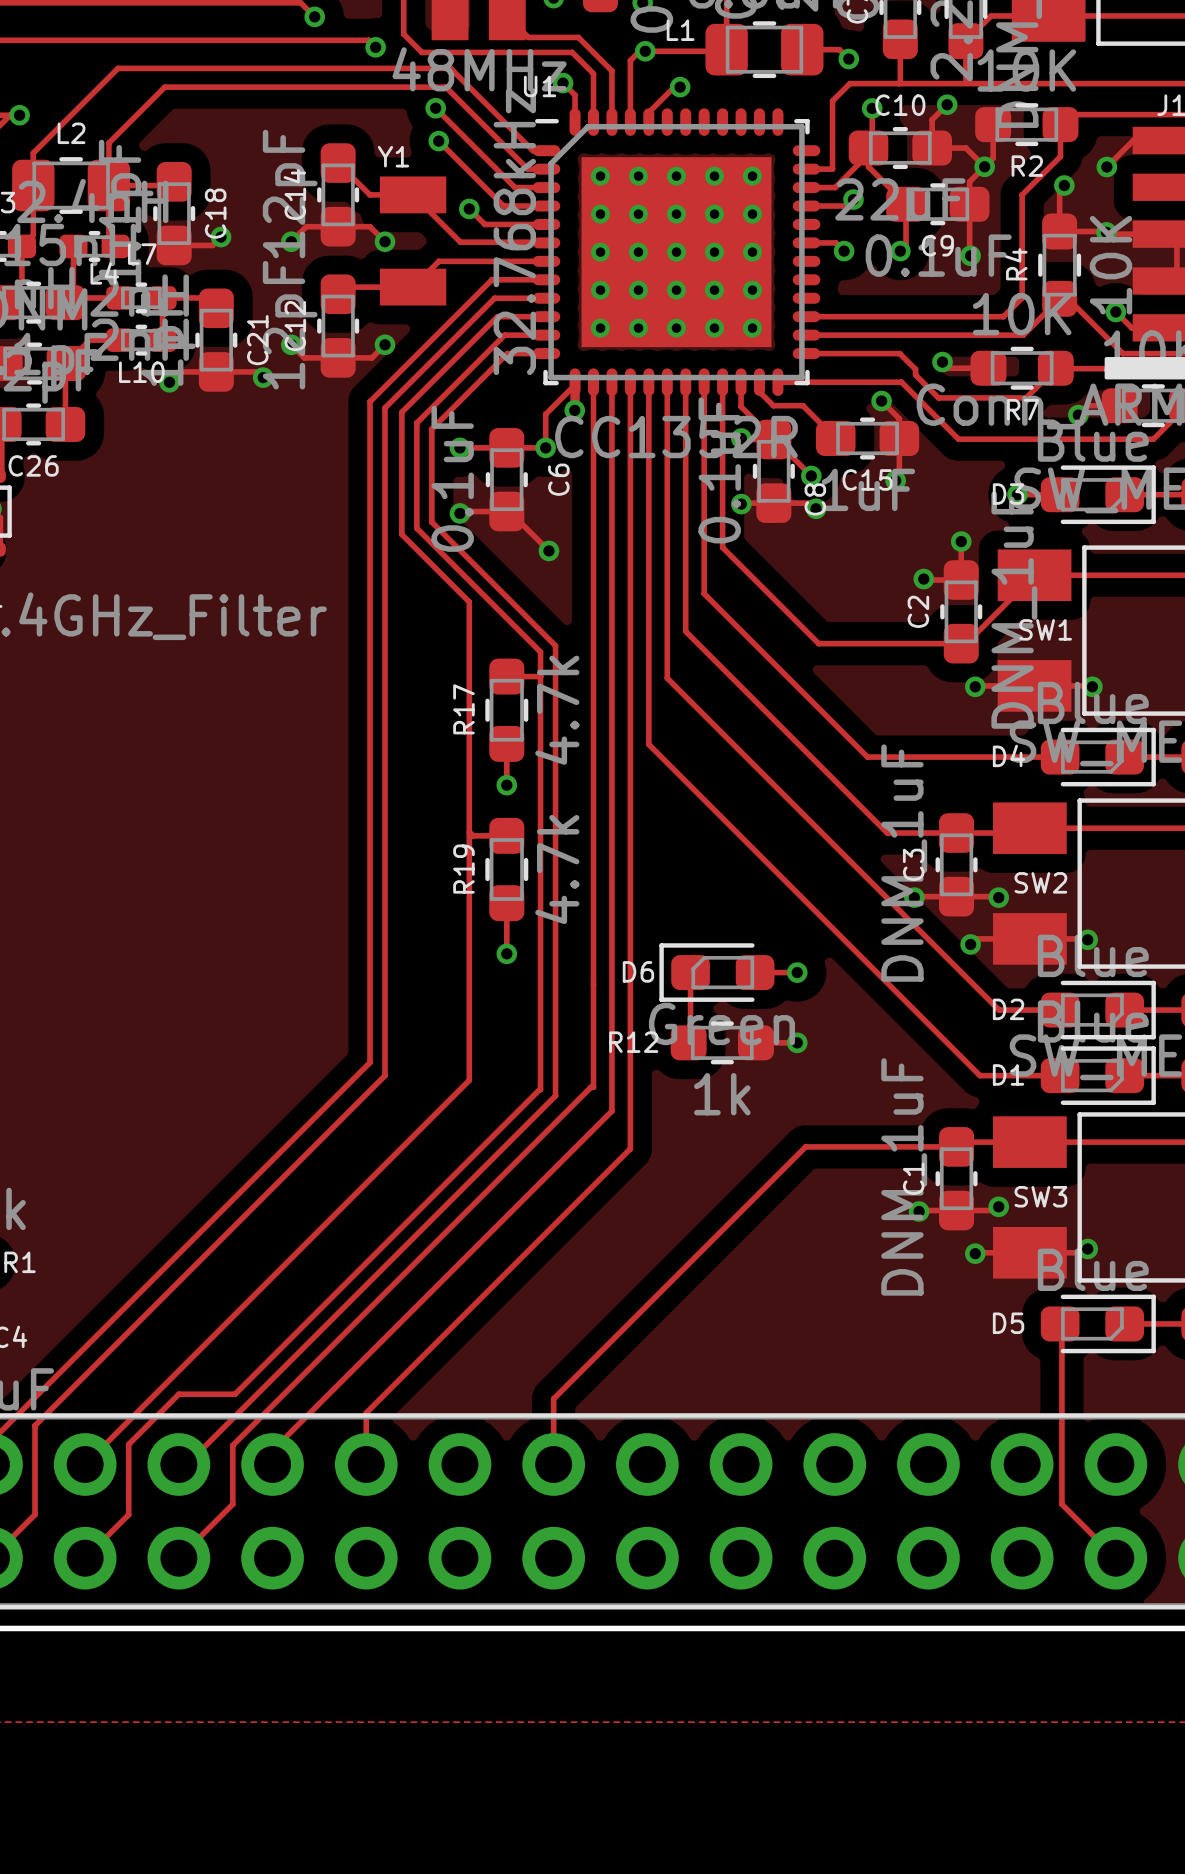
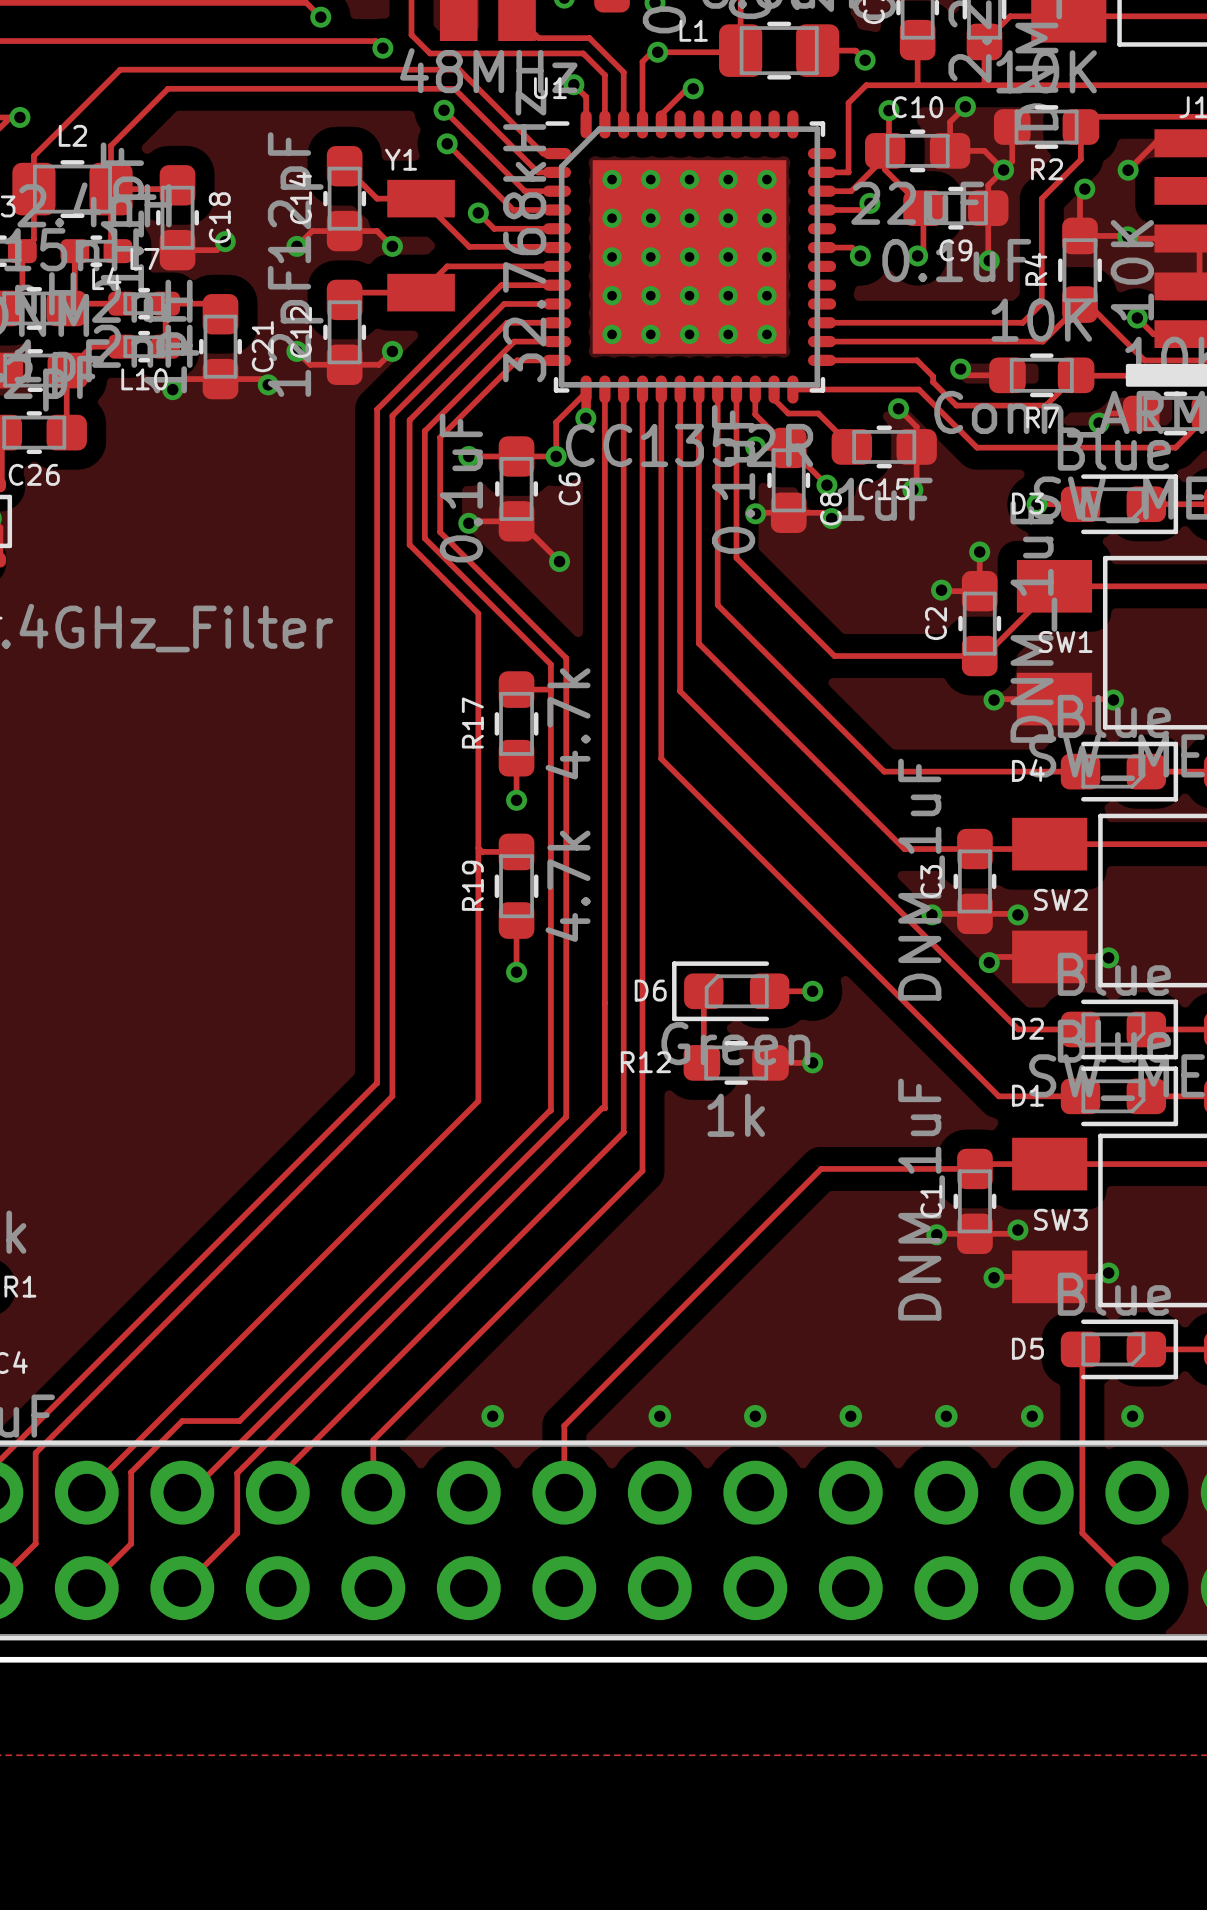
part: none -> (492, 1416)
part: none -> (659, 1416)
part: none -> (755, 1416)
part: none -> (850, 1416)
part: none -> (946, 1416)
part: none -> (1032, 1416)
part: none -> (1132, 1416)

